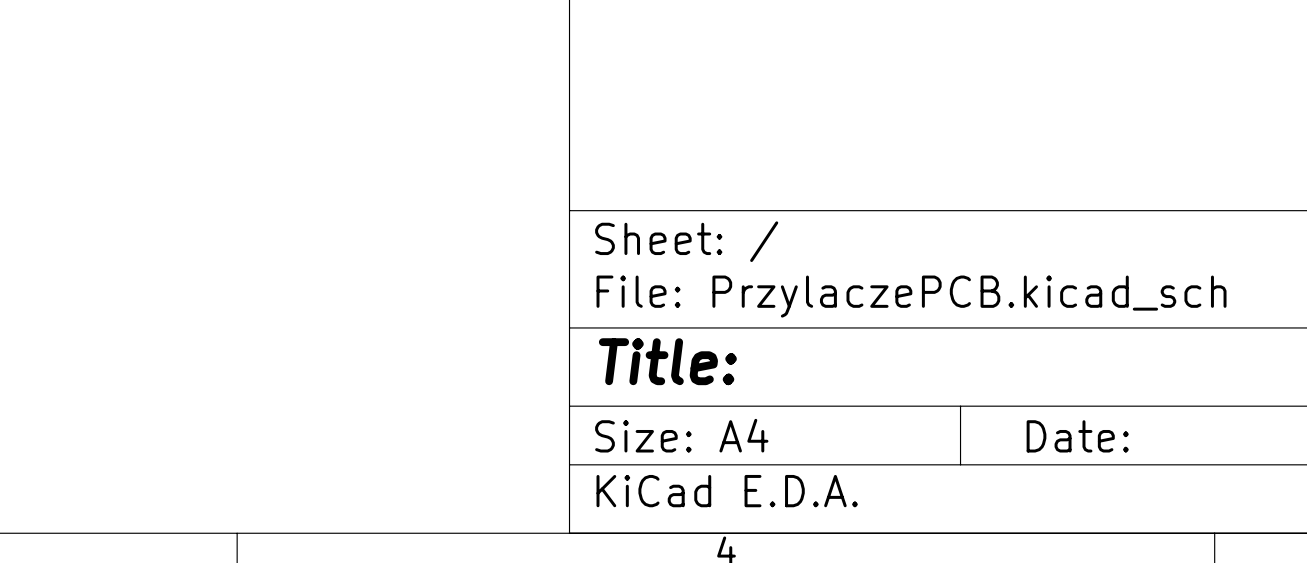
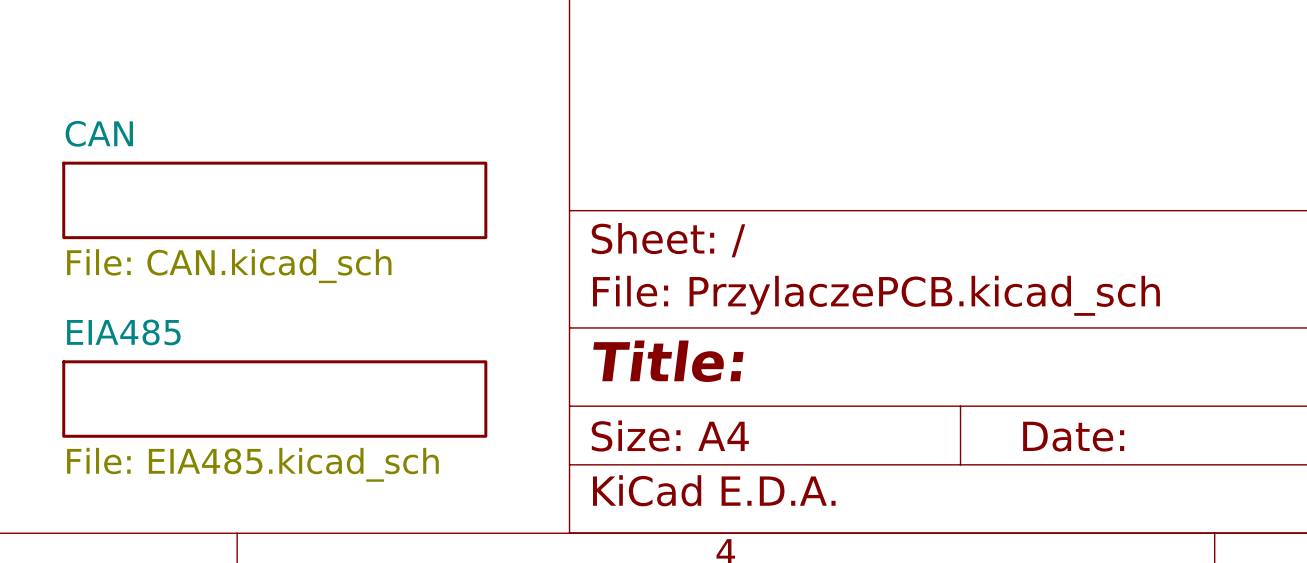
sheet CAN: none -> File: CAN.kicad_sch (274, 200)
sheet EIA485: none -> File: EIA485.kicad_sch (274, 399)

